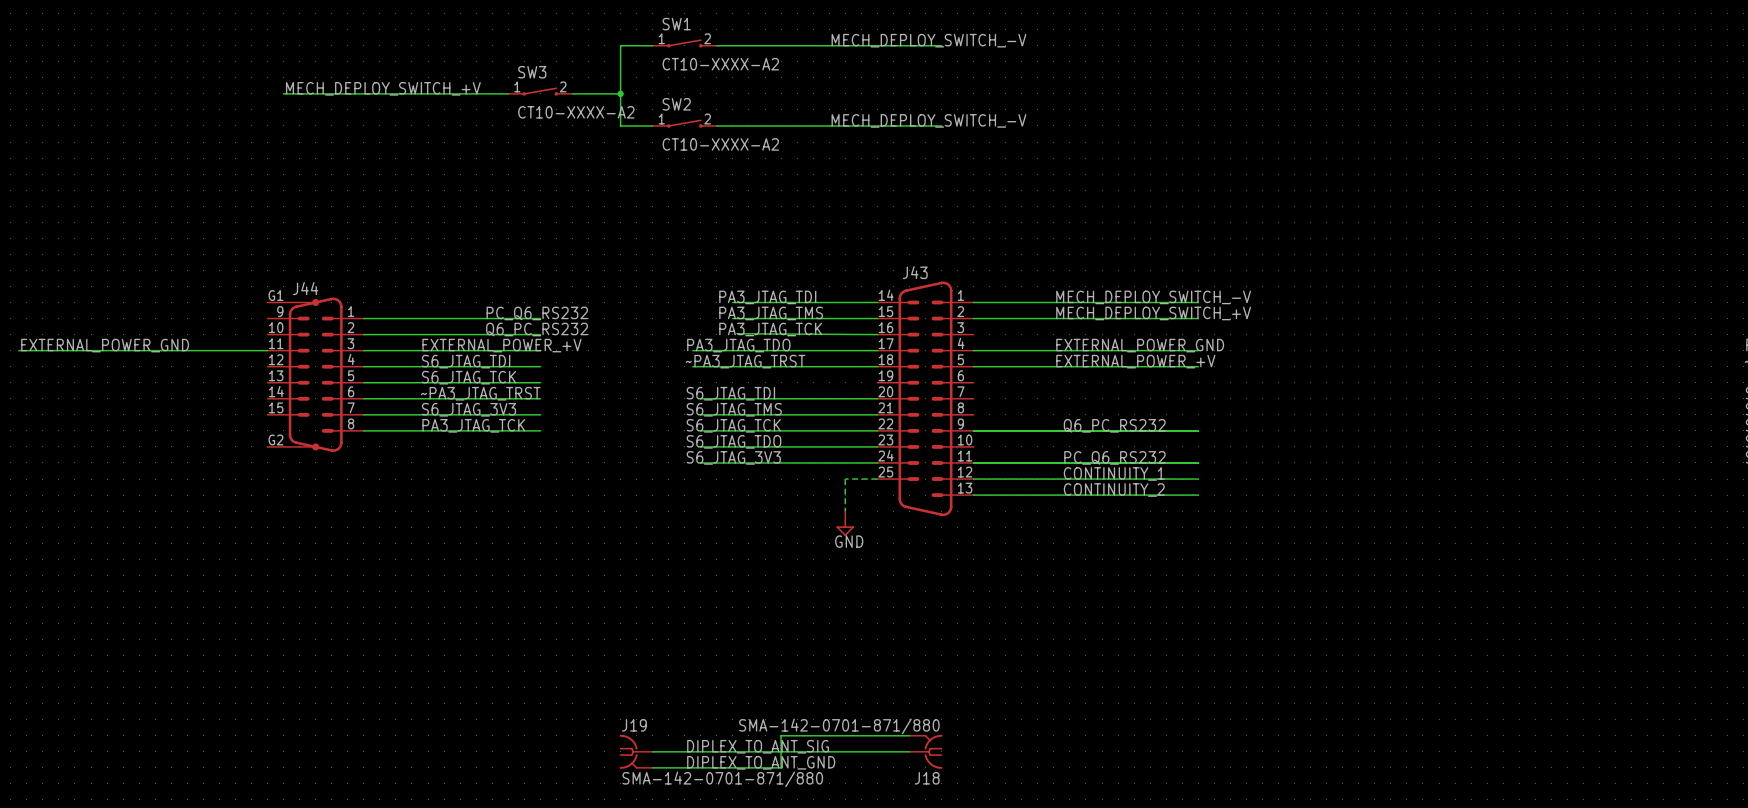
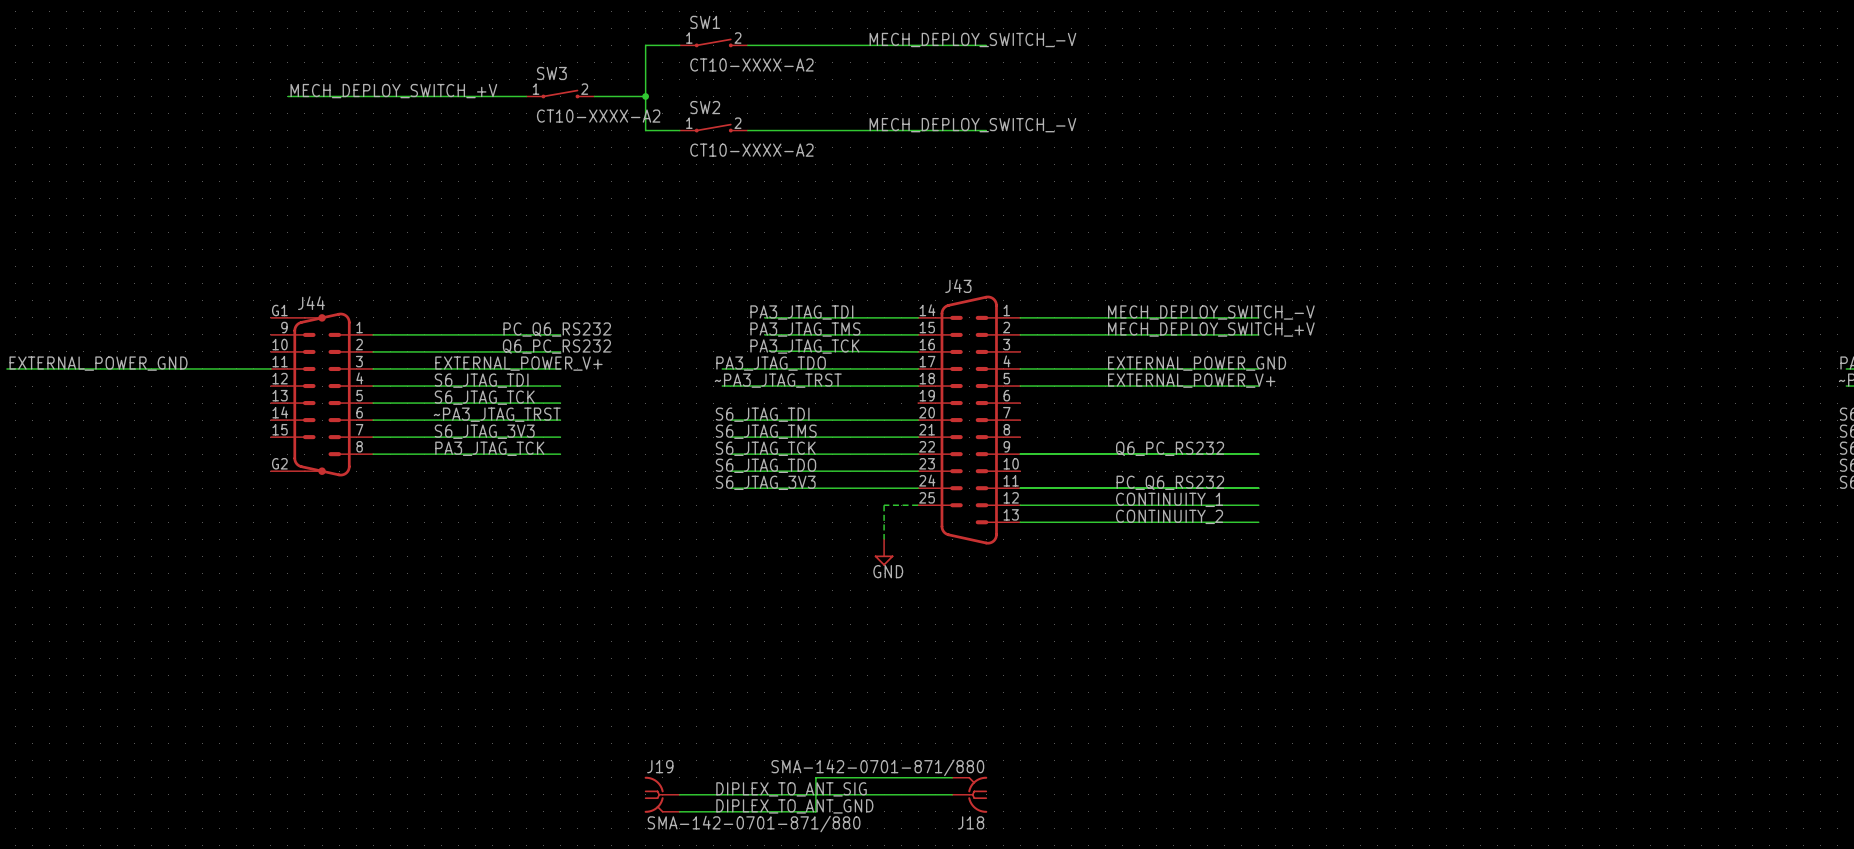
label: EXTERNAL_POWER_+V (501, 345) -> EXTERNAL_POWER_V+ (518, 363)
label: EXTERNAL_POWER_+V (1135, 361) -> EXTERNAL_POWER_V+ (1191, 380)

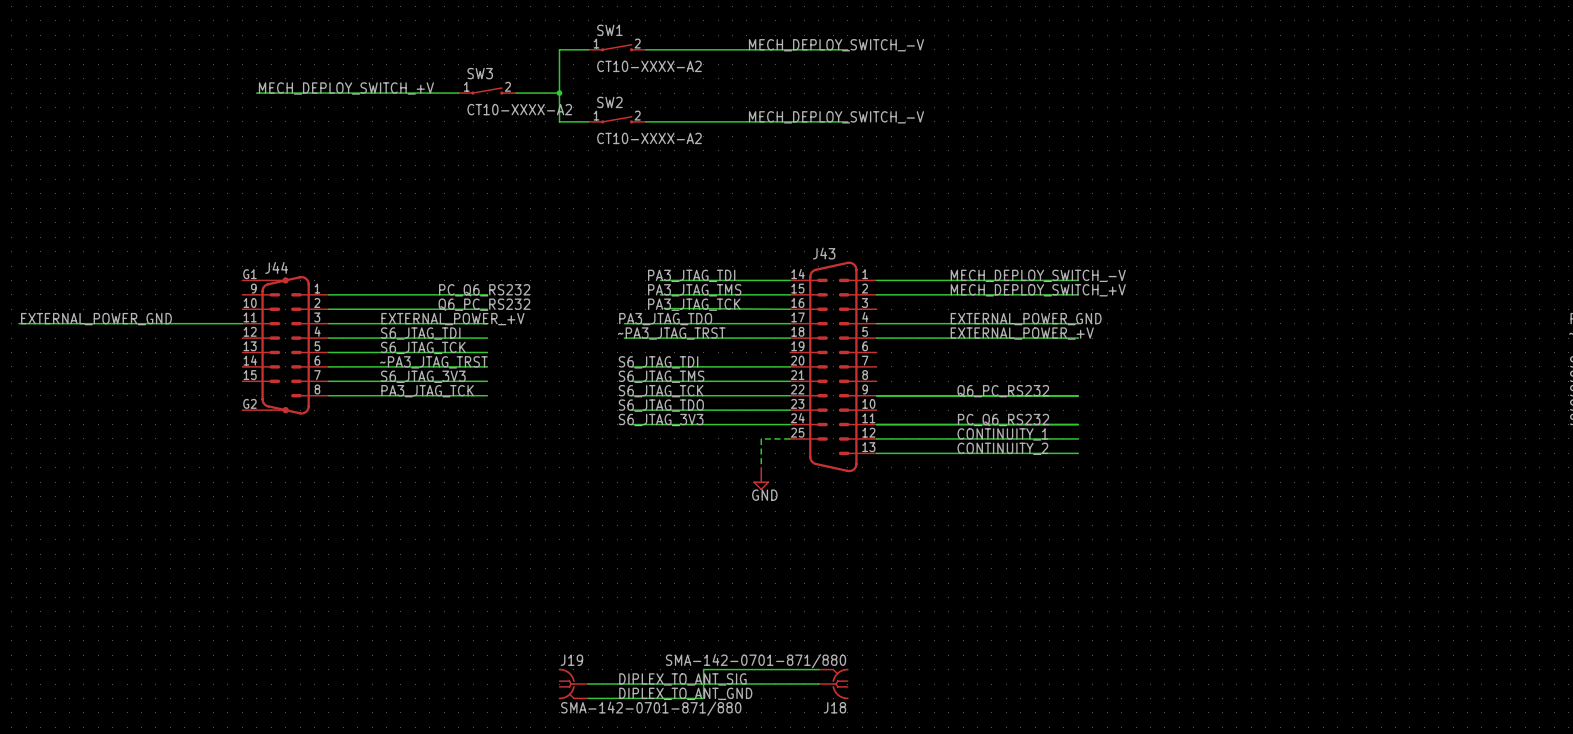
label: EXTERNAL_POWER_V+ (518, 363) -> EXTERNAL_POWER_+V (452, 319)
label: EXTERNAL_POWER_V+ (1191, 380) -> EXTERNAL_POWER_+V (1022, 333)

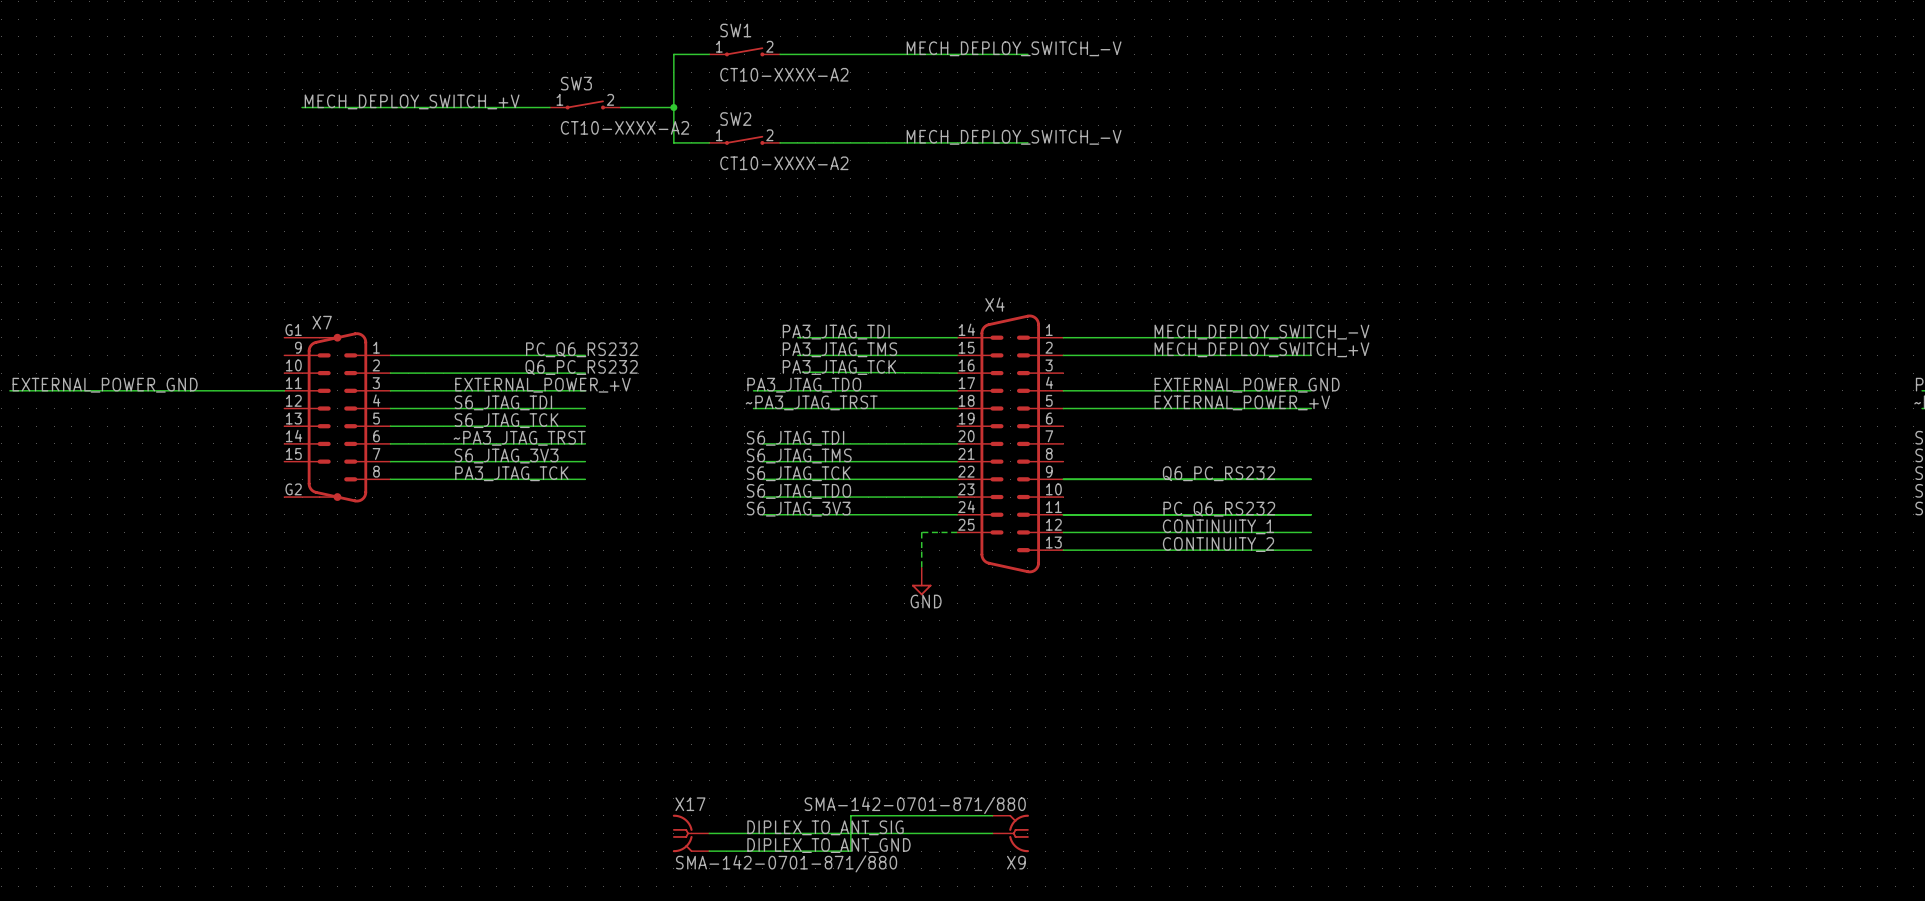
J43 name: J43 (824, 253) -> X4 (994, 304)
J44 name: J44 (276, 267) -> X7 (322, 322)
J19 name: J19 (571, 660) -> X17 (690, 804)
J18 name: J18 (834, 707) -> X9 (1016, 862)

